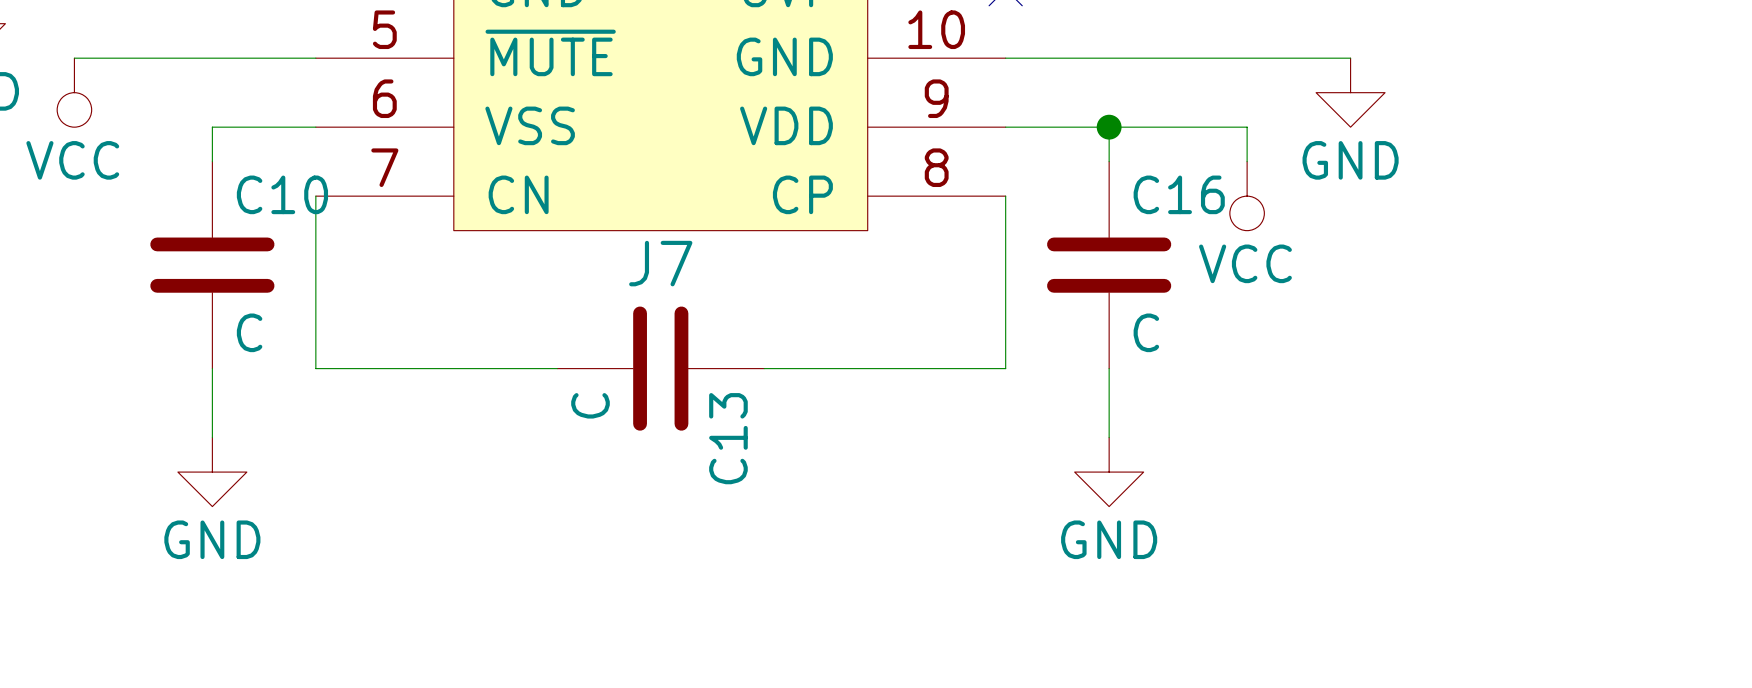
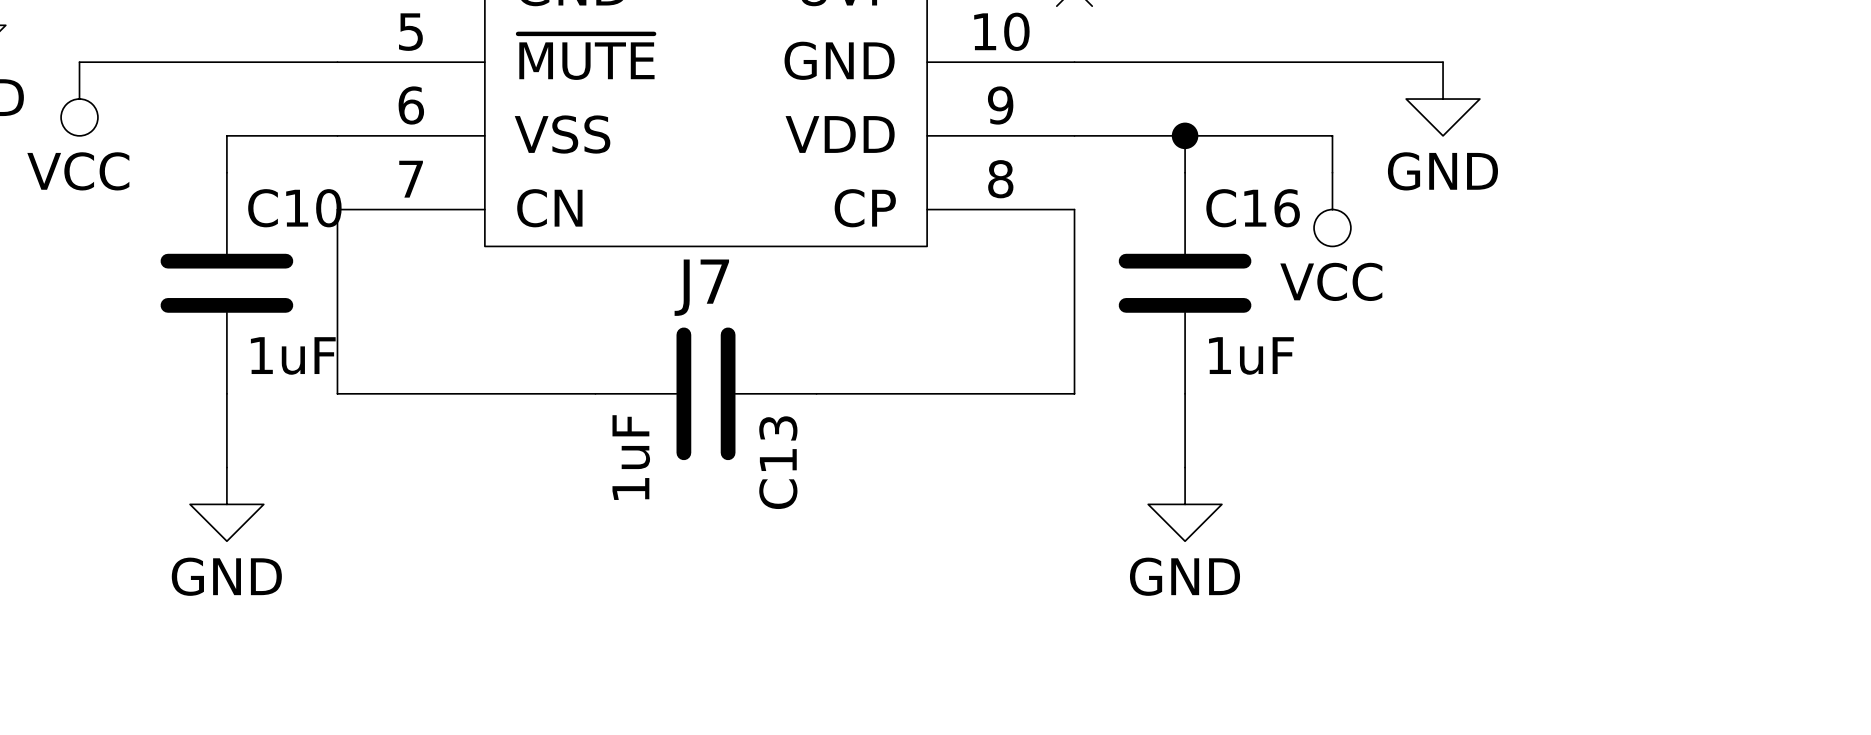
C10 value: C (249, 332) -> 1uF (293, 355)
C16 value: C (1146, 332) -> 1uF (1251, 355)
C13 value: C (590, 405) -> 1uF (631, 457)

